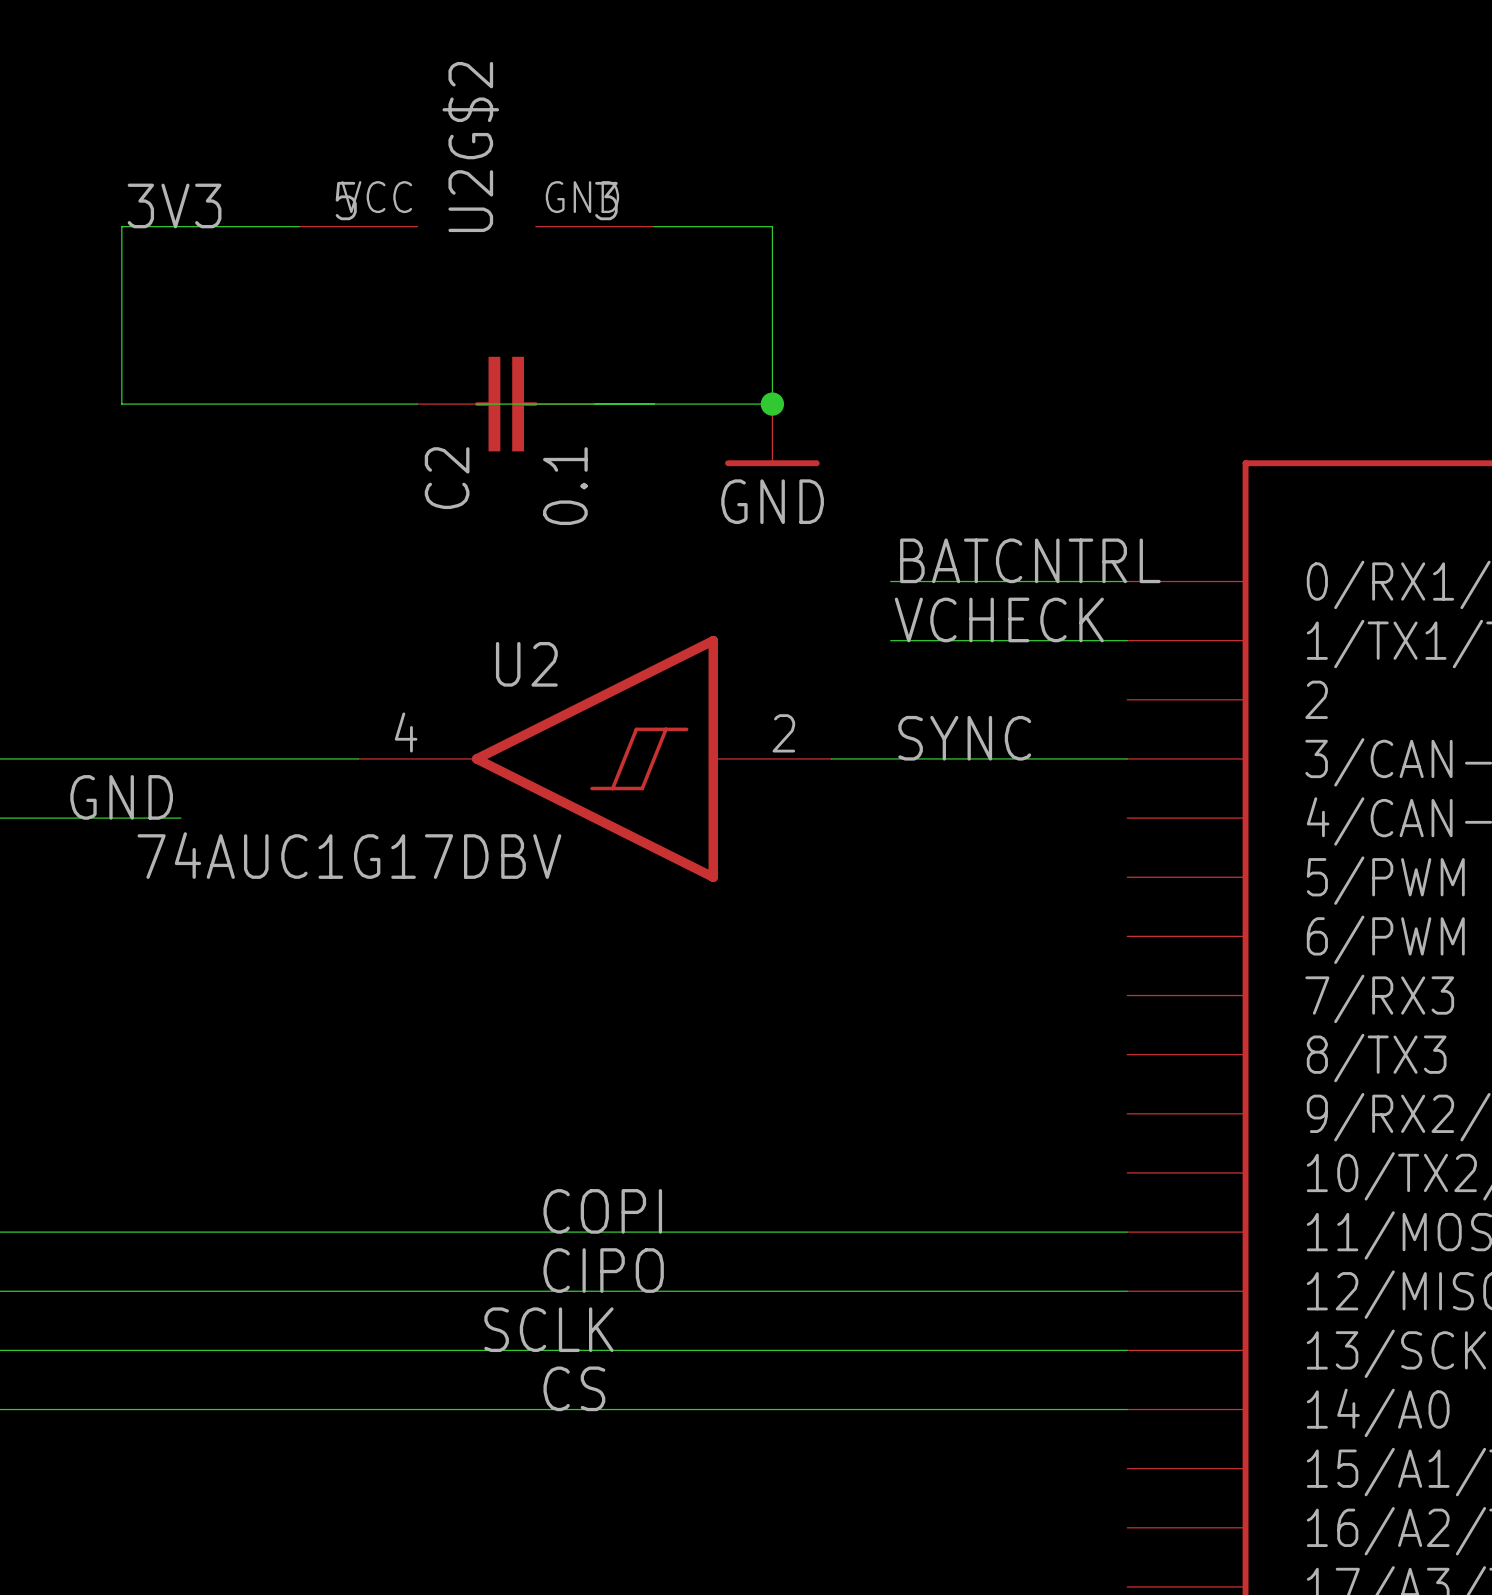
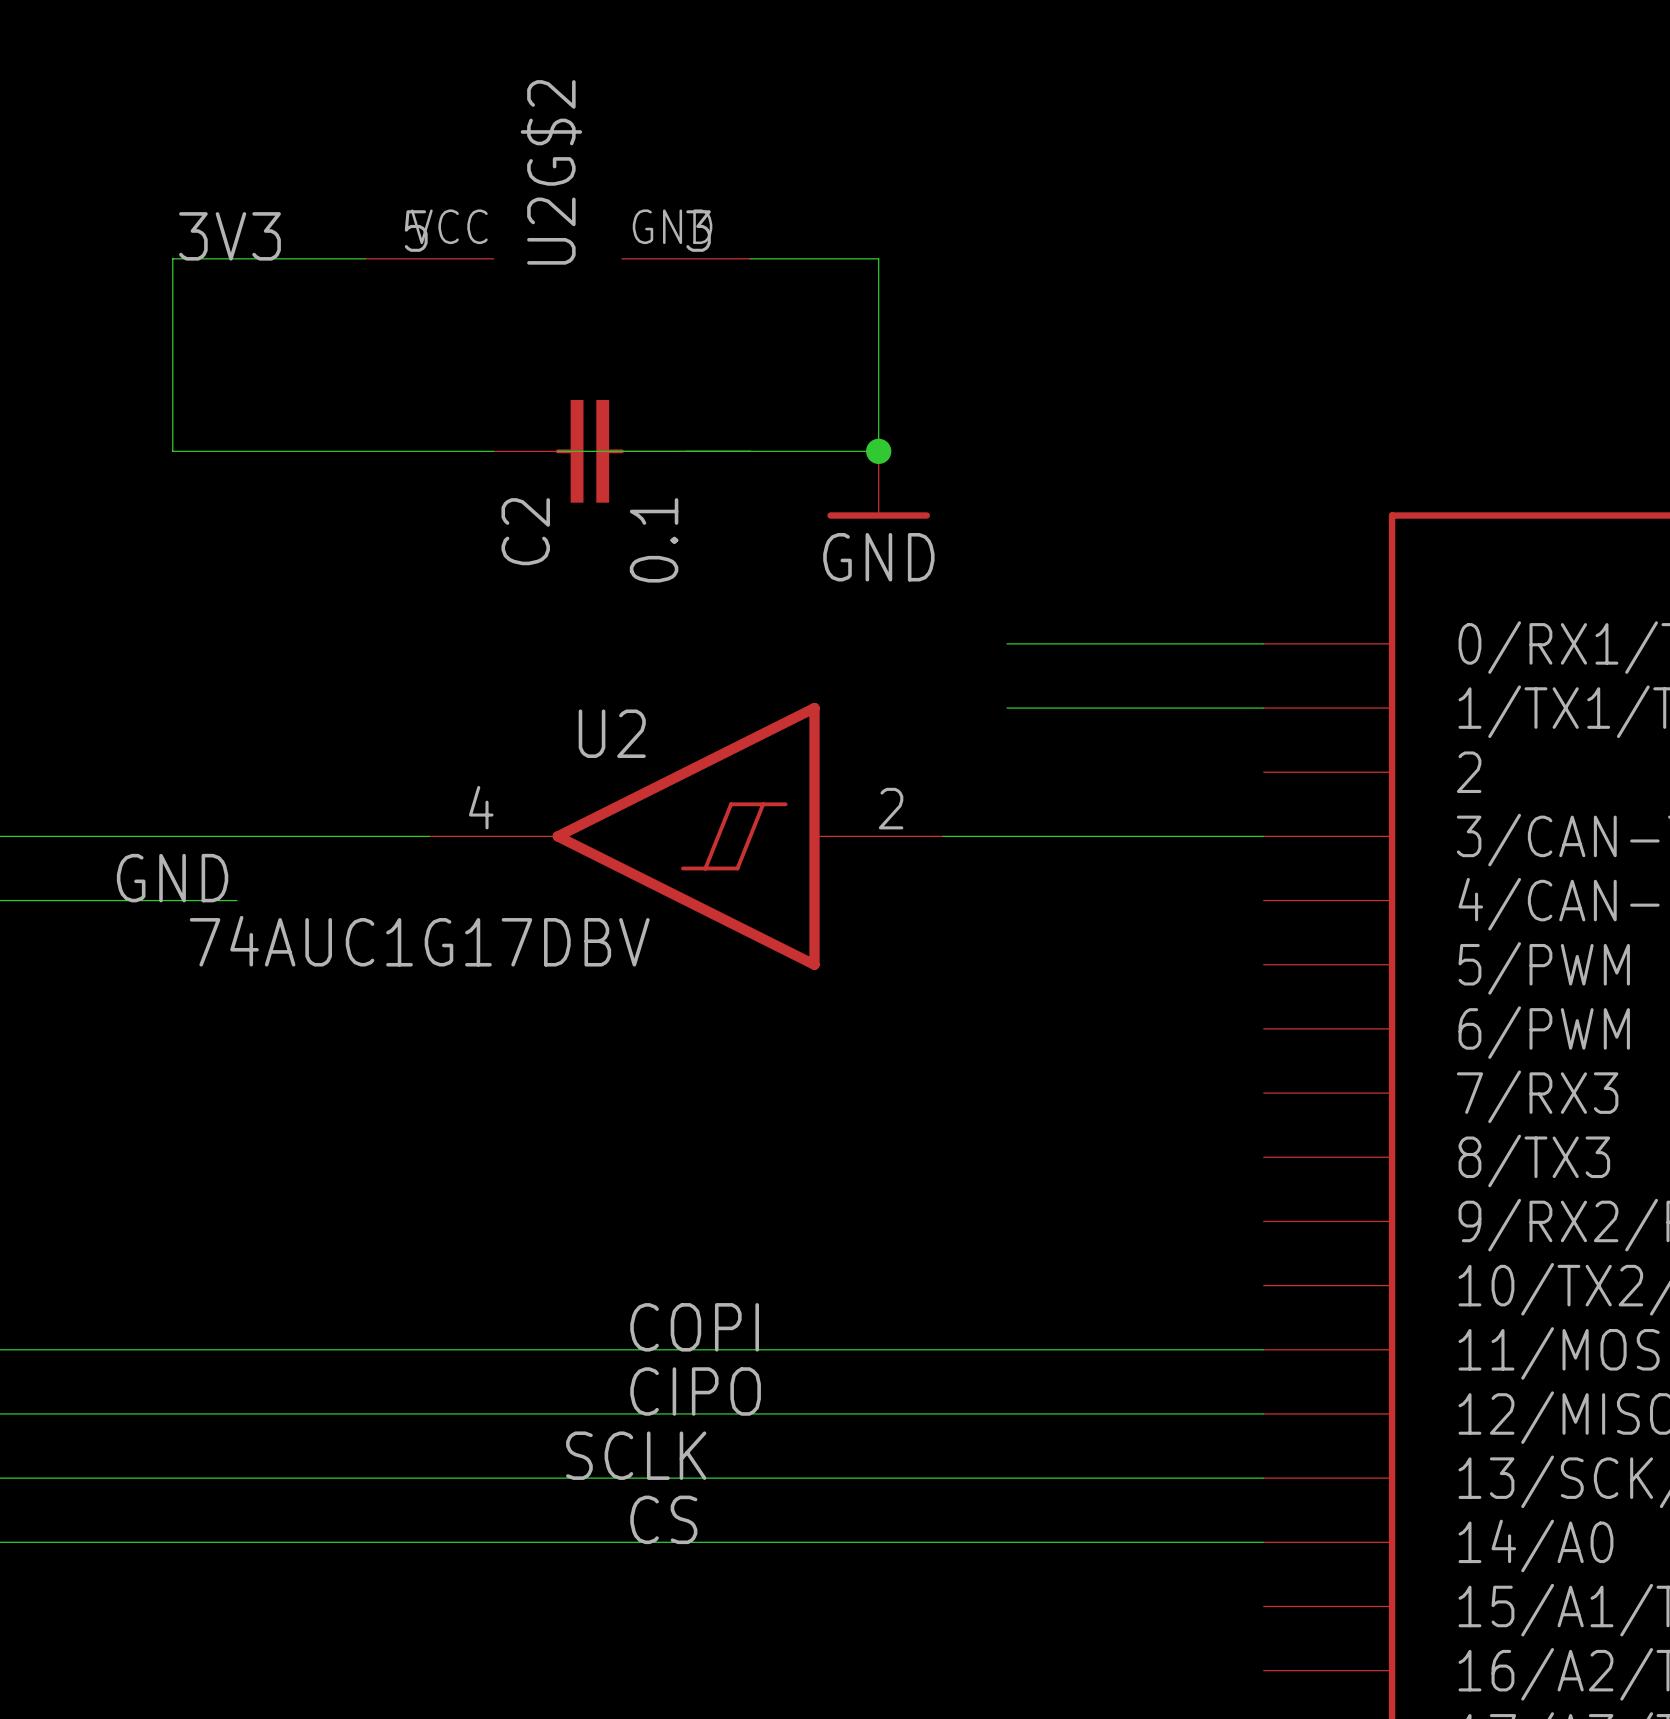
label: BATCNTRL (1030, 560) -> none
label: VCHECK (999, 619) -> none
label: SYNC (964, 738) -> none

